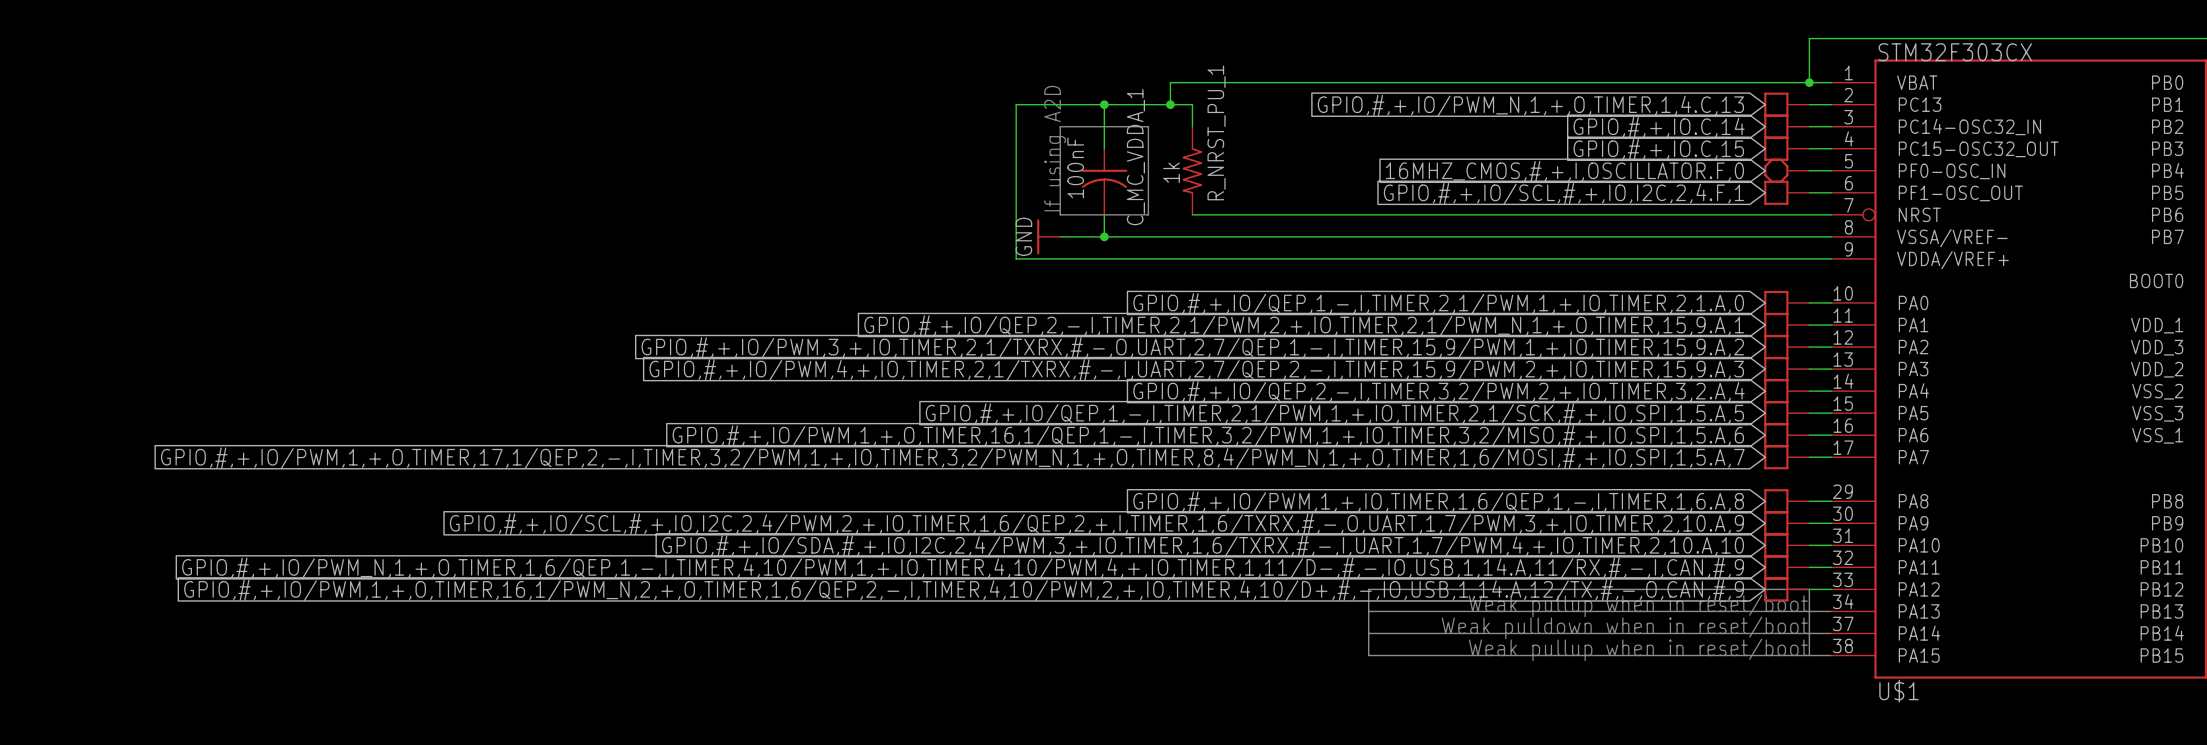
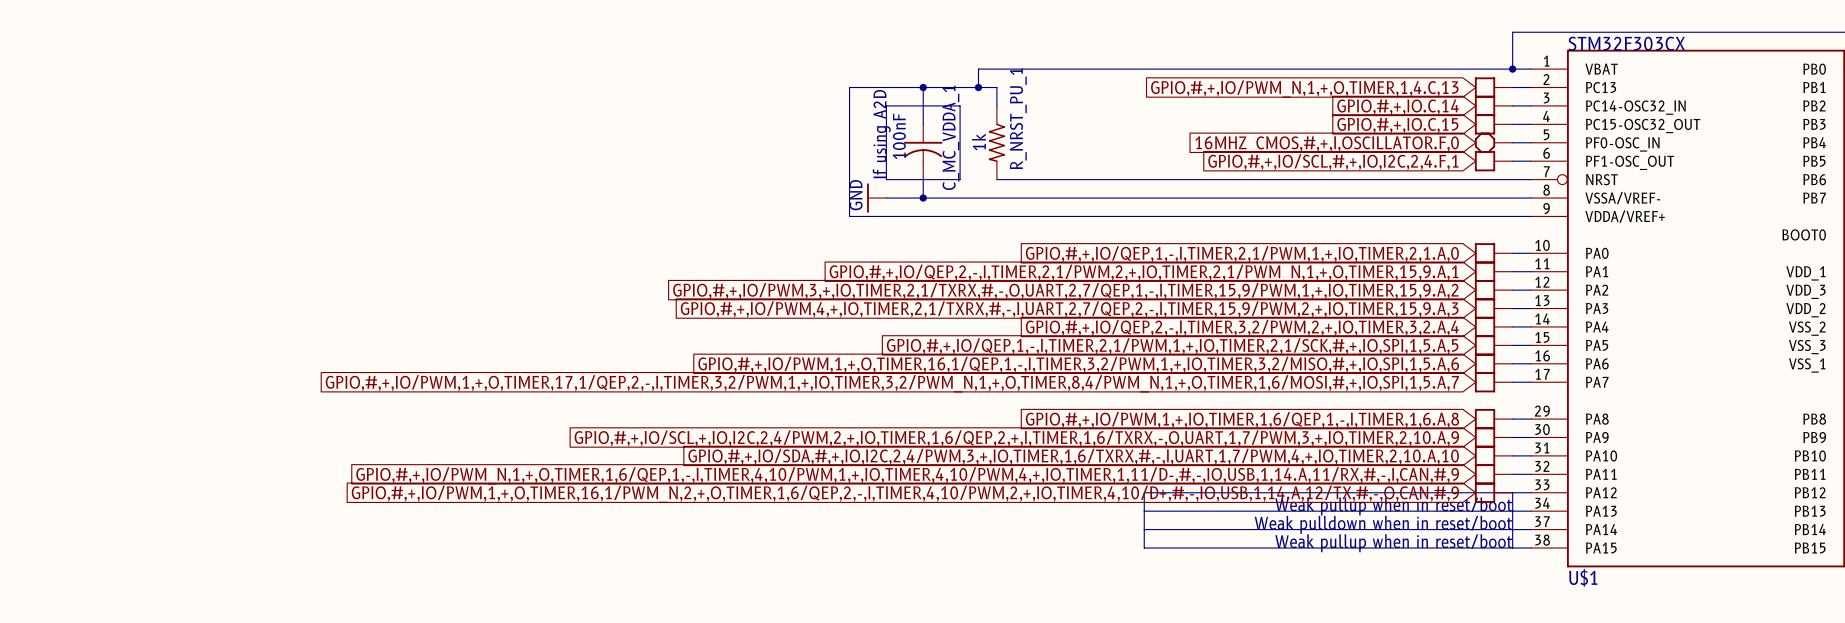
global label: GPIO,#,+,IO/SCL,#,+,IO,I2C,2,4/PWM,2,+,IO,TIMER,1,6/QEP,2,+,I,TIMER,1,6/TXRX,#,-,O,UART,1,7/PWM,3,+,IO,TIMER,2,10.A,9 (1096, 524) -> GPIO,#,+,IO/SCL,+,IO,I2C,2,4/PWM,2,+,IO,TIMER,1,6/QEP,2,+,I,TIMER,1,6/TXRX,-,O,UART,1,7/PWM,3,+,IO,TIMER,2,10.A,9 (1016, 438)

